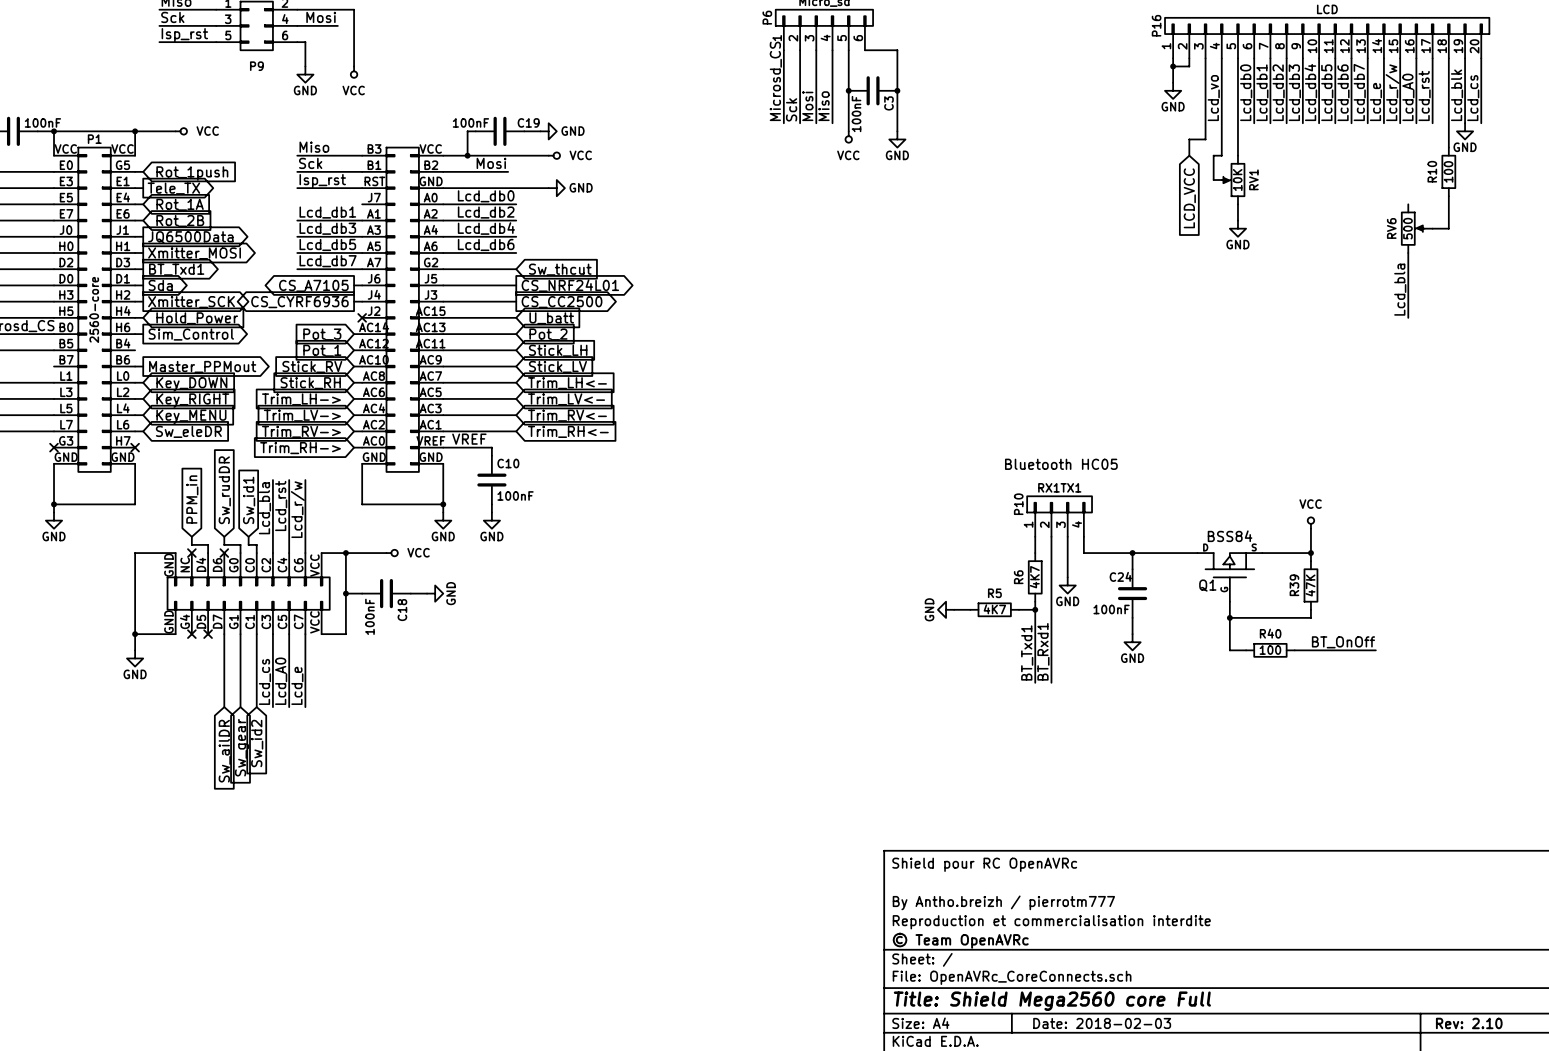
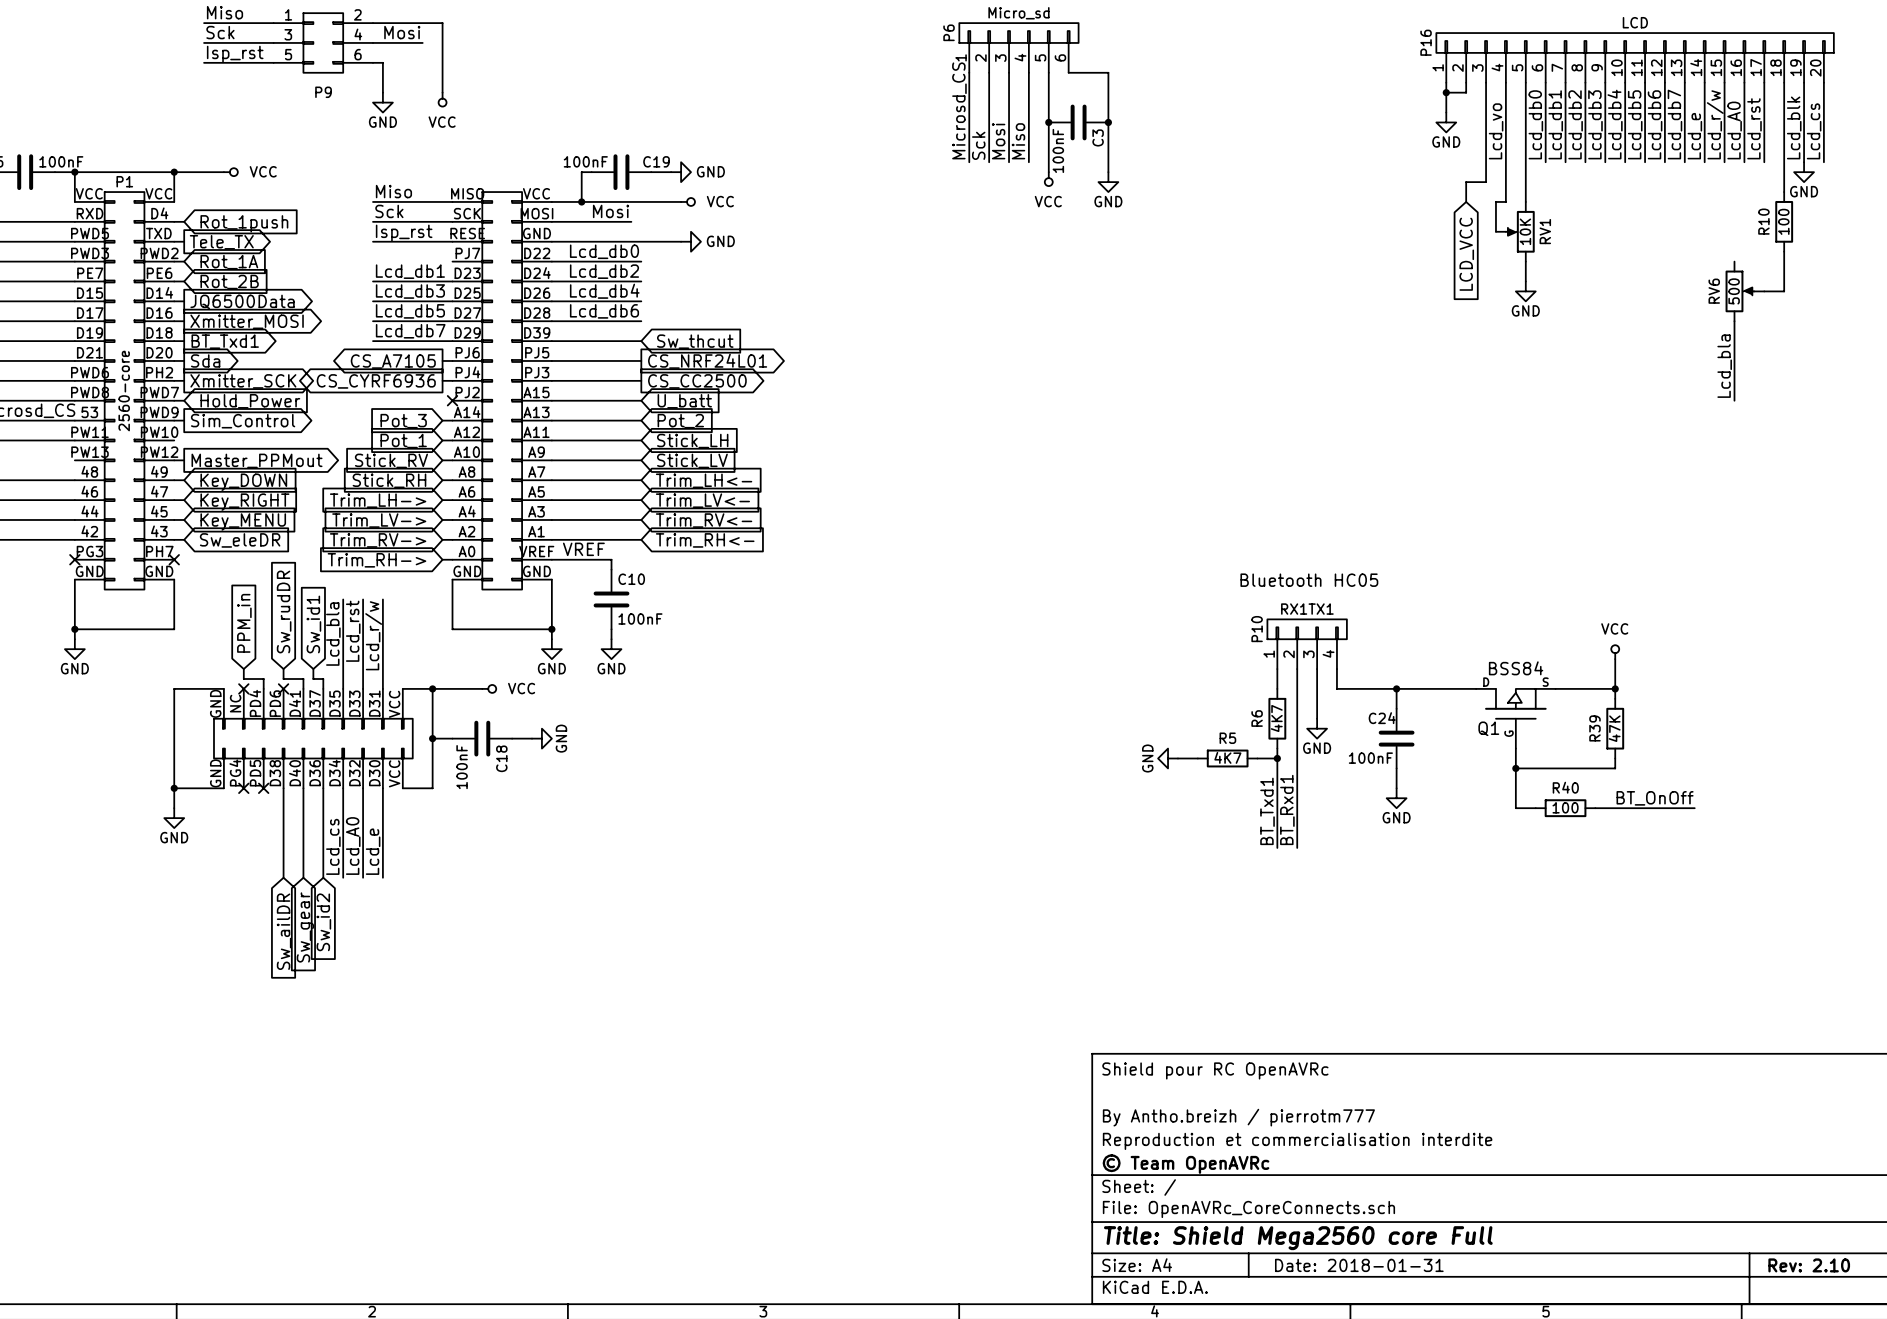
P1 symbol: [54, 147, 444, 635] -> [74, 192, 552, 789]
title block: Date: 2018-02-03 (1102, 1023) -> Date: 2018-01-31 (1359, 1265)

